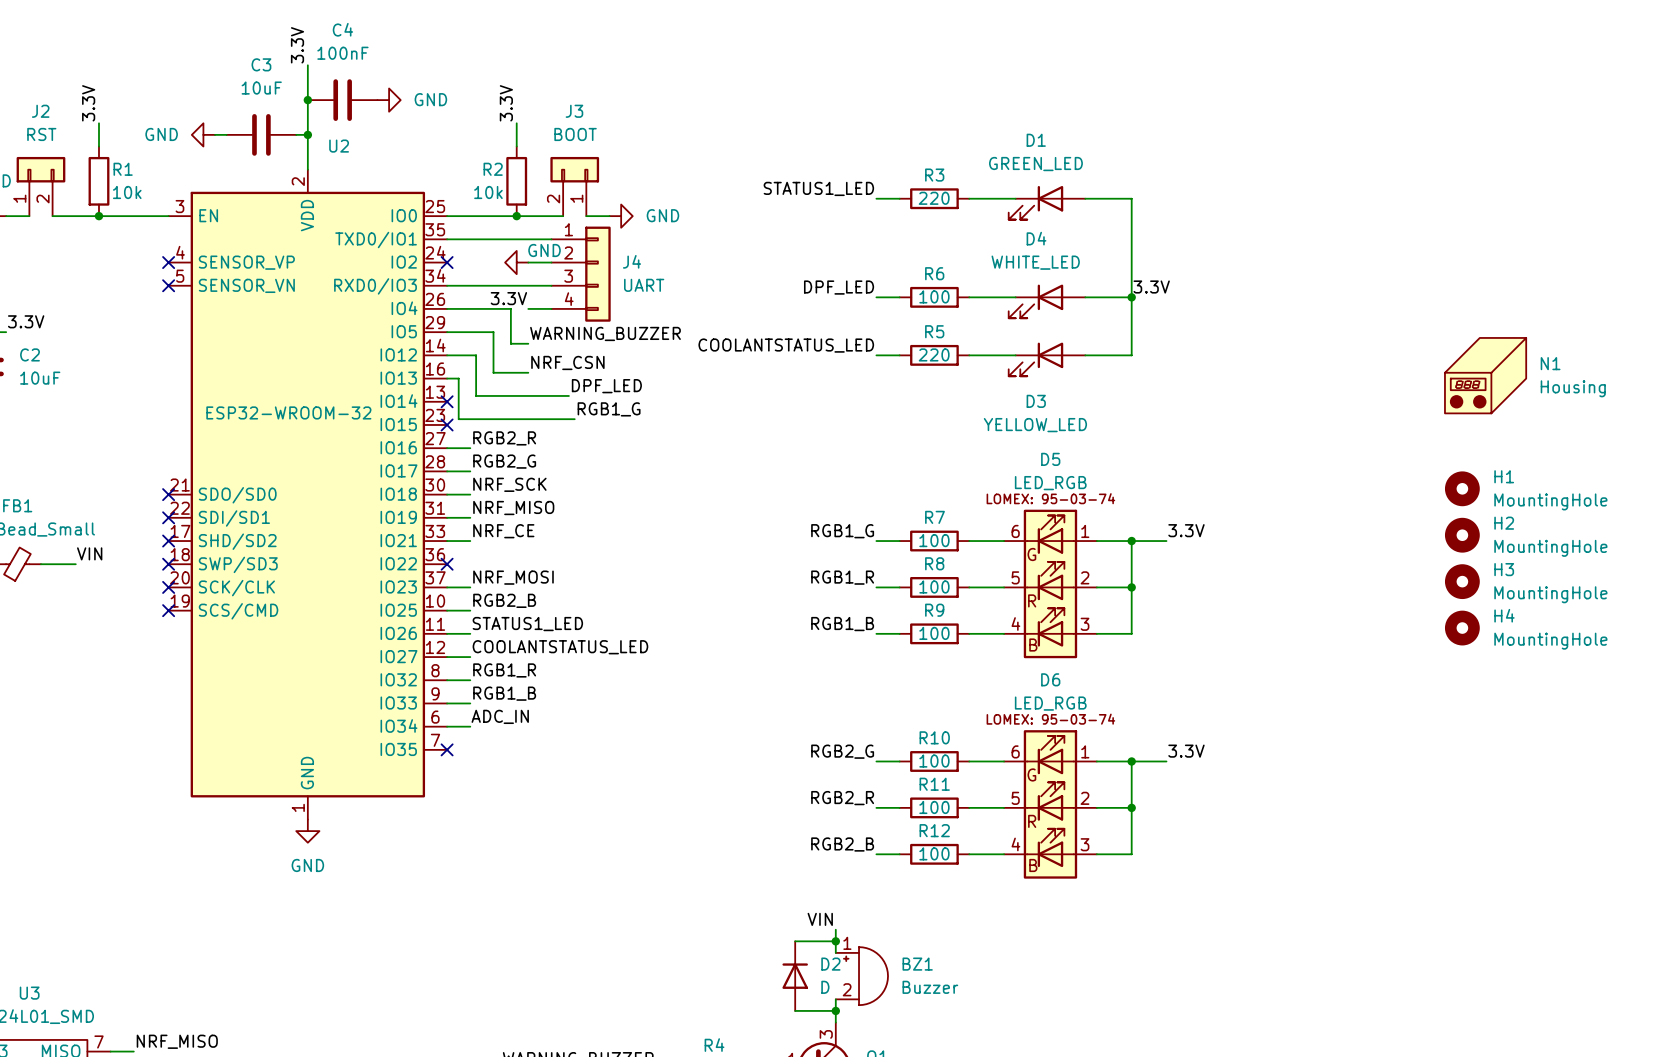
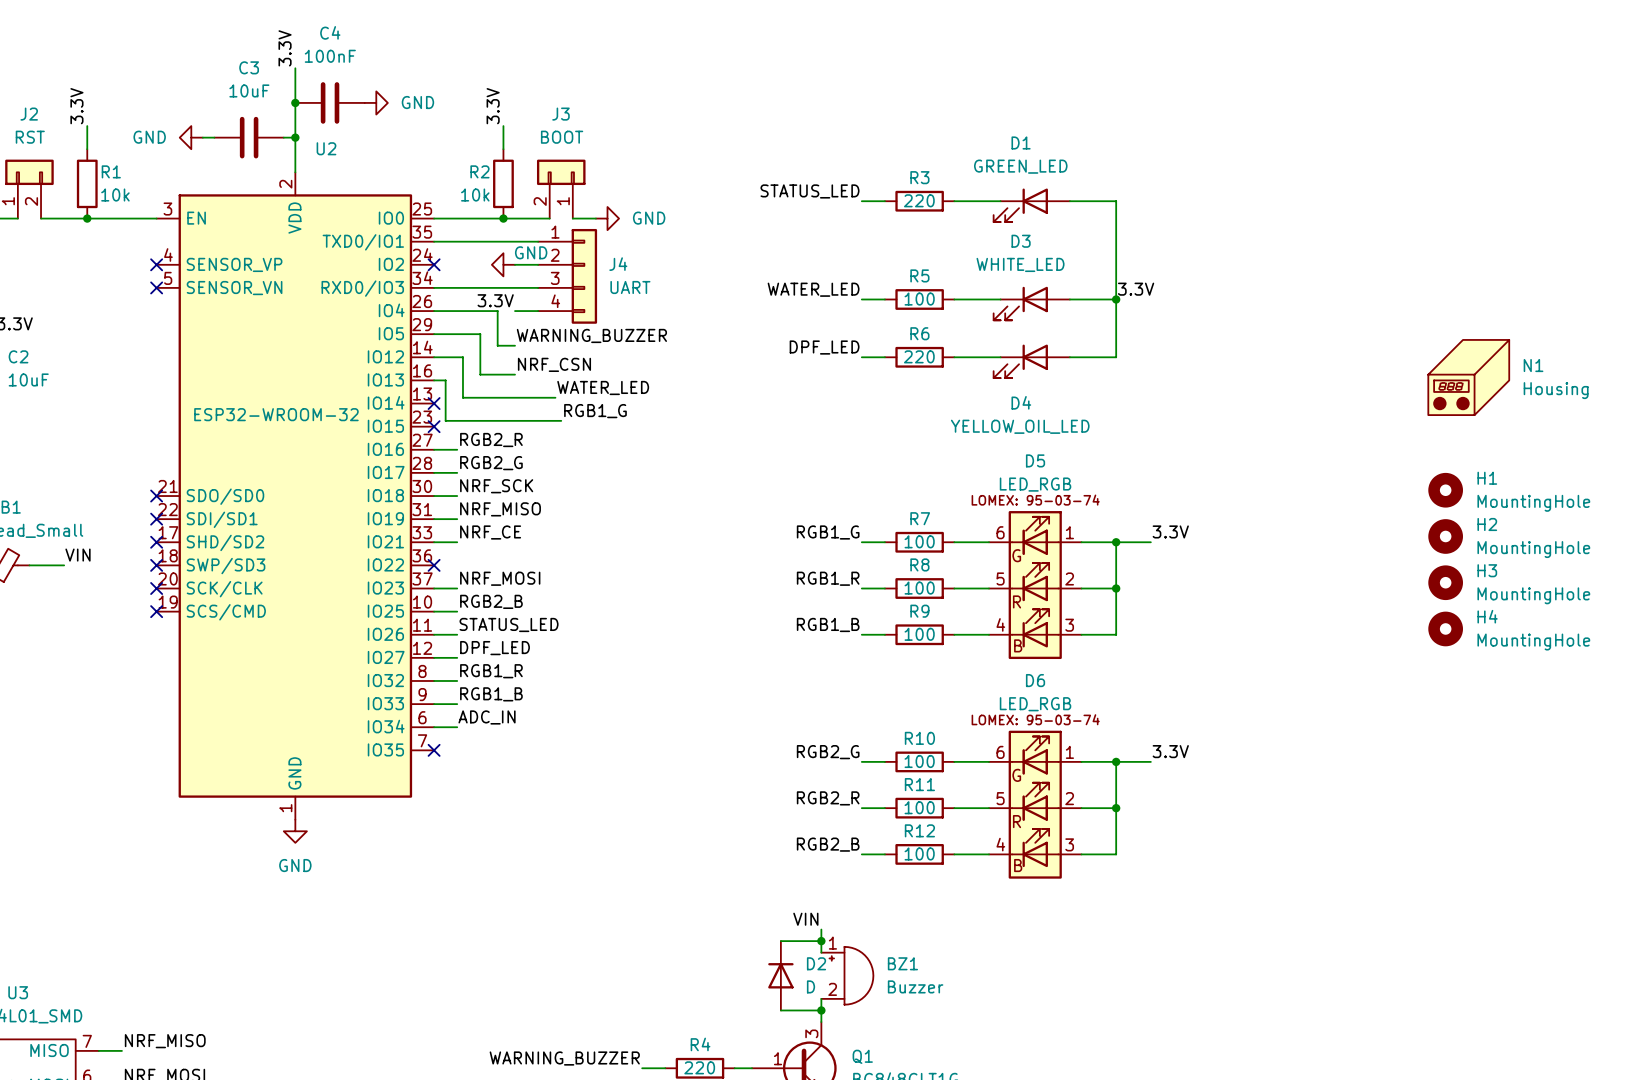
label: STATUS1_LED (818, 188) -> STATUS_LED (809, 191)
D4 name: D4 (1036, 238) -> D3 (1021, 241)
R6 name: R6 (934, 273) -> R5 (919, 275)
label: DPF_LED (839, 287) -> WATER_LED (813, 289)
R5 name: R5 (934, 331) -> R6 (919, 333)
label: COOLANTSTATUS_LED (786, 345) -> DPF_LED (824, 347)
label: DPF_LED (606, 386) -> WATER_LED (603, 387)
D3 name: D3 (1036, 401) -> D4 (1021, 402)
D3 value: YELLOW_LED (1035, 425) -> YELLOW_OIL_LED (1020, 426)
label: STATUS1_LED (527, 624) -> STATUS_LED (509, 624)
label: COOLANTSTATUS_LED (560, 647) -> DPF_LED (495, 648)

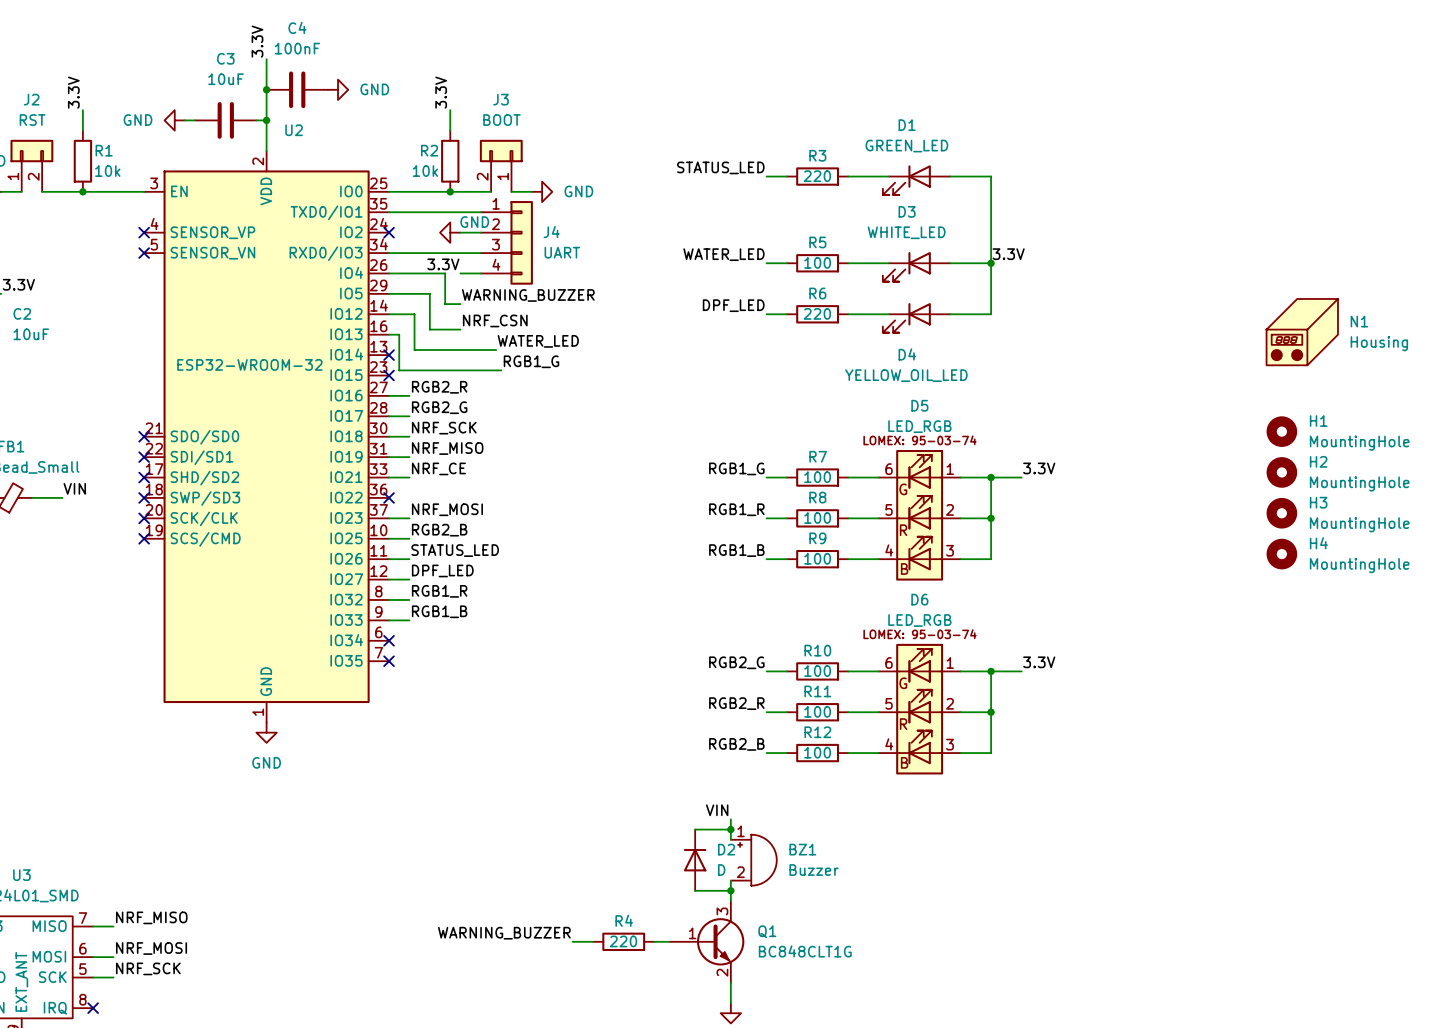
label: ADC_IN (487, 717) -> none
wire: (434, 727) (457, 727) -> none
no-connect mark: none -> (389, 640)

